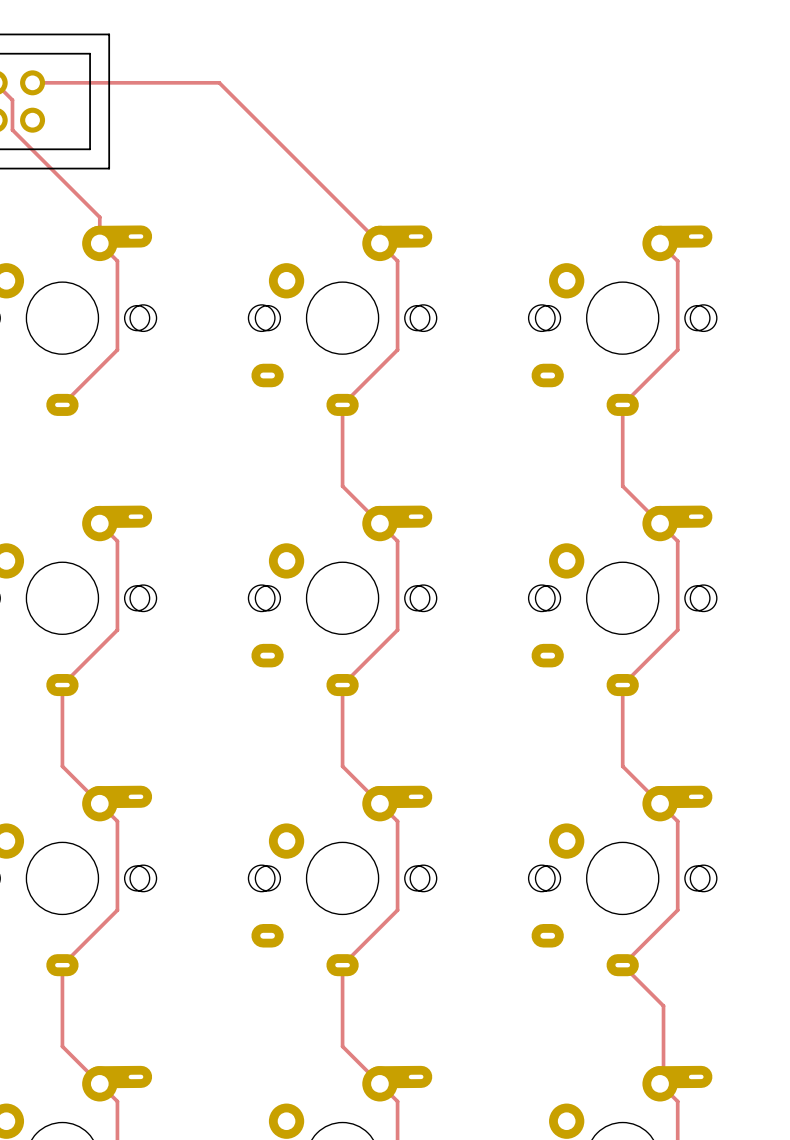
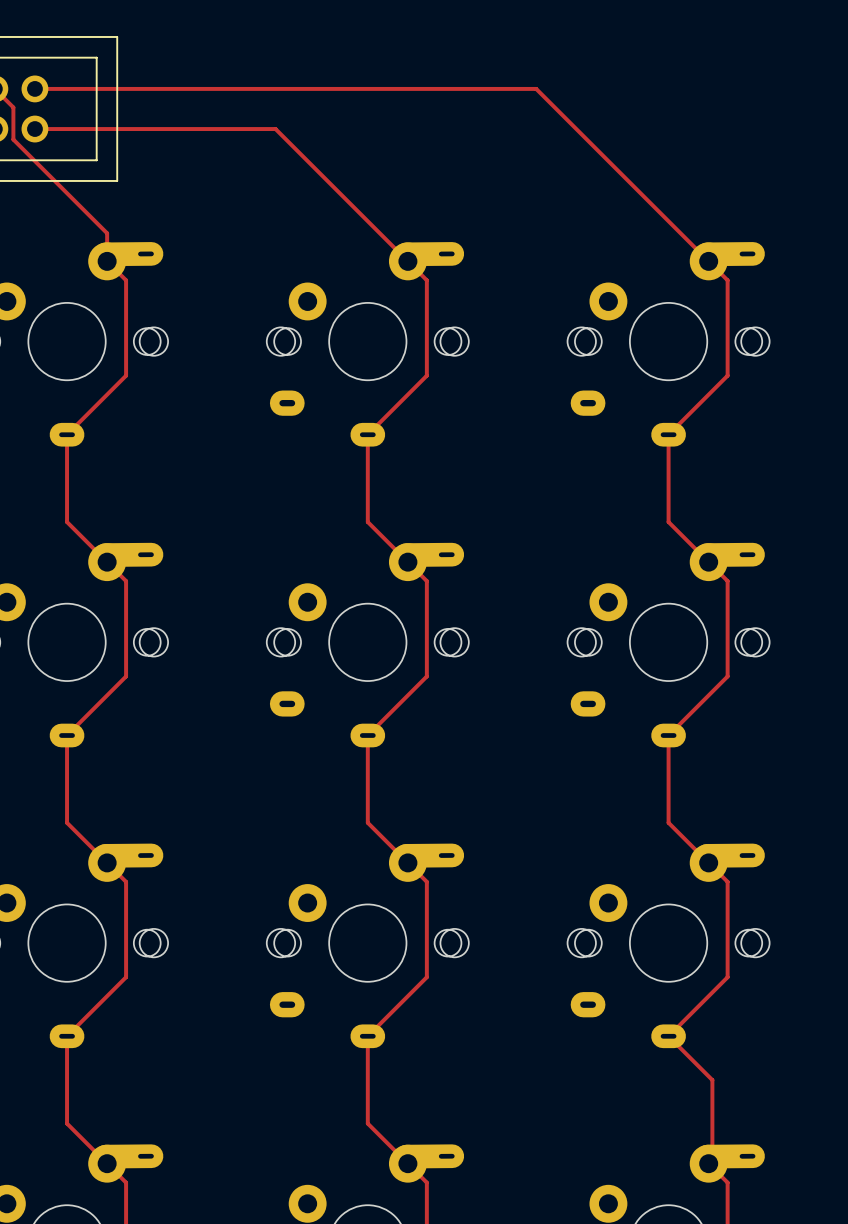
track: (219, 82) (256, 120) -> (34, 129) (275, 129)
track: none -> (235, 88) (536, 88) (708, 261)
track: none -> (67, 434) (67, 522) (107, 562)

